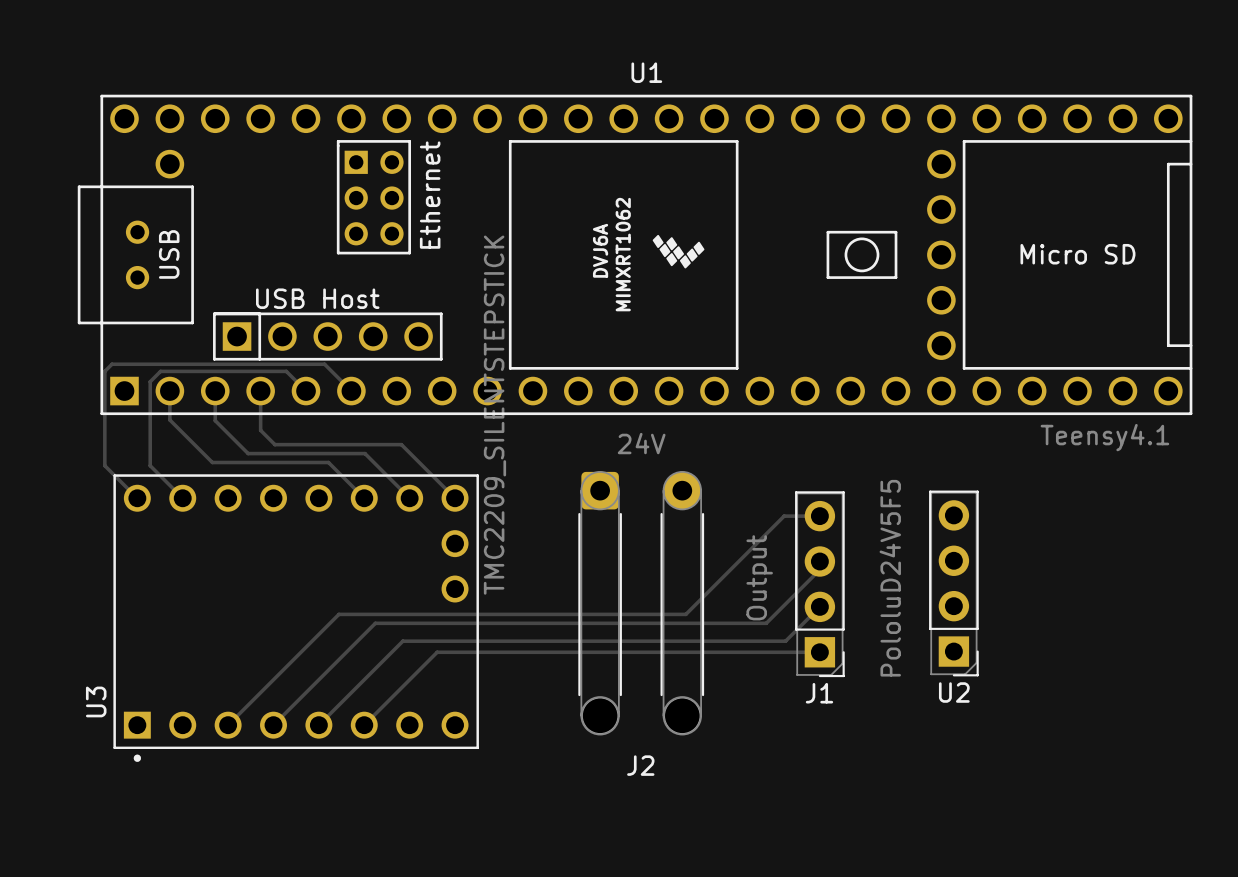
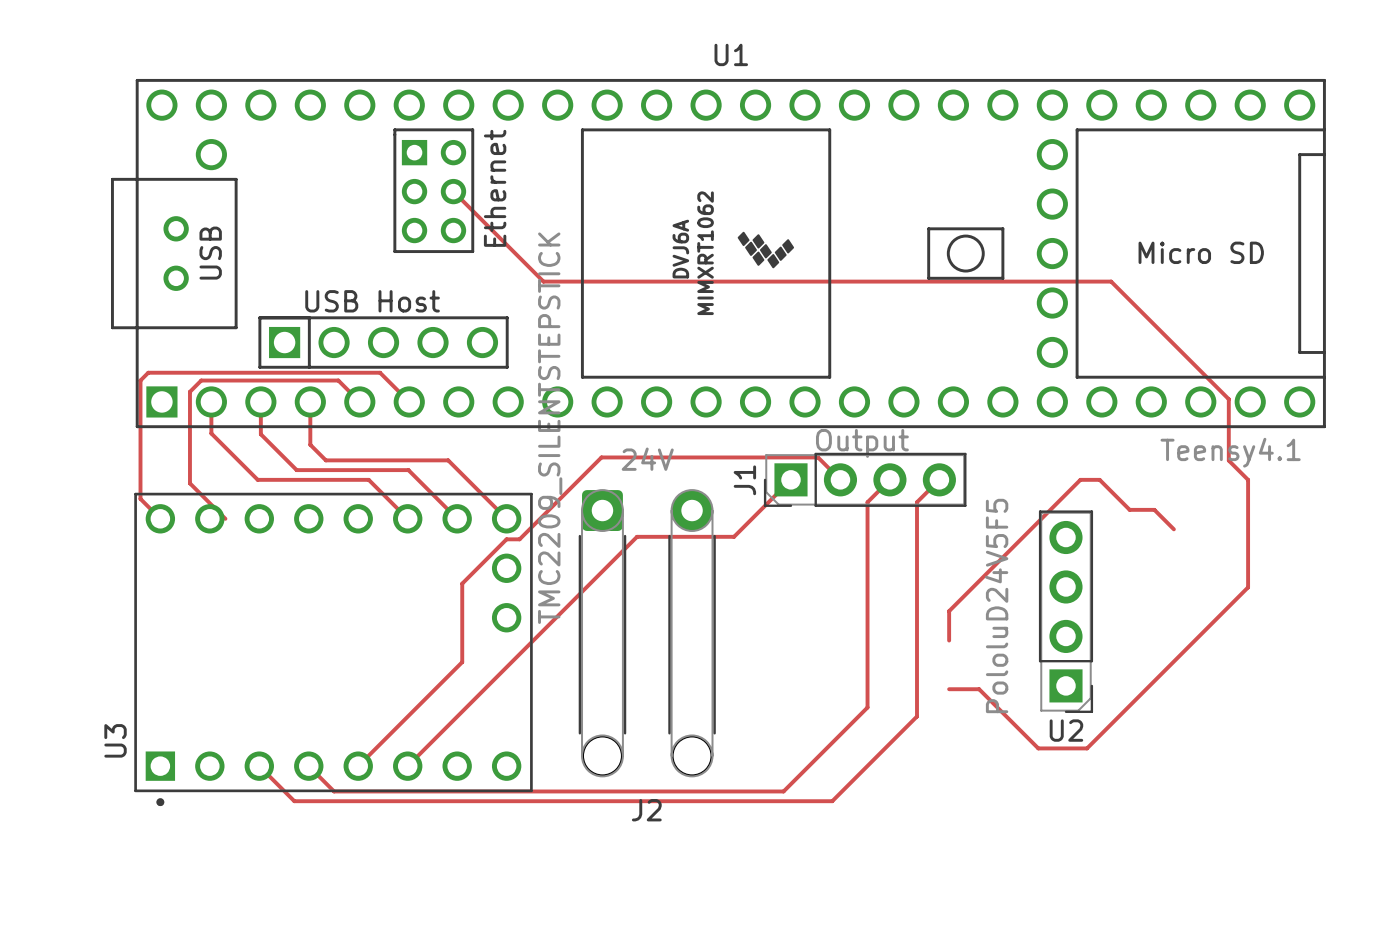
track: none -> (453, 191) (543, 281) (1111, 281) (1228, 399) (1228, 460) (1248, 479) (1248, 587) (1087, 748) (1038, 748) (979, 689) (949, 689)
track: (387, 444) (401, 444) (455, 498) -> (448, 460) (506, 518)
track: (350, 453) (364, 453) (409, 498) -> (408, 470) (457, 518)
track: (314, 462) (328, 462) (364, 498) -> (368, 479) (407, 518)
track: none -> (790, 479) (734, 536) (637, 536) (407, 766)
track: none -> (840, 479) (818, 457) (601, 457) (519, 539) (506, 539) (462, 583) (462, 662) (358, 766)
track: none -> (889, 479) (867, 502) (867, 707) (783, 791) (334, 791) (308, 766)
track: none -> (939, 479) (917, 502) (917, 716) (832, 801) (294, 801) (259, 766)
track: (104, 465) (137, 498) -> (140, 483) (140, 498) (160, 518)
track: none -> (1173, 529) (1154, 509) (1129, 509) (1099, 479) (1080, 479) (949, 611) (949, 640)
track: (819, 516) (784, 516) (685, 614) (338, 614) (228, 725) -> none
track: (819, 561) (819, 569) (766, 623) (375, 623) (273, 725) -> none
J1 rotation: 0° (819, 584) -> 90° clockwise (865, 479)
J1 position: (819, 584) -> (865, 479)
J2 position: (641, 603) -> (647, 633)
track: (819, 606) (785, 641) (402, 641) (318, 725) -> none
U3 position: (296, 618) -> (333, 649)
track: (819, 652) (437, 652) (364, 725) -> none

